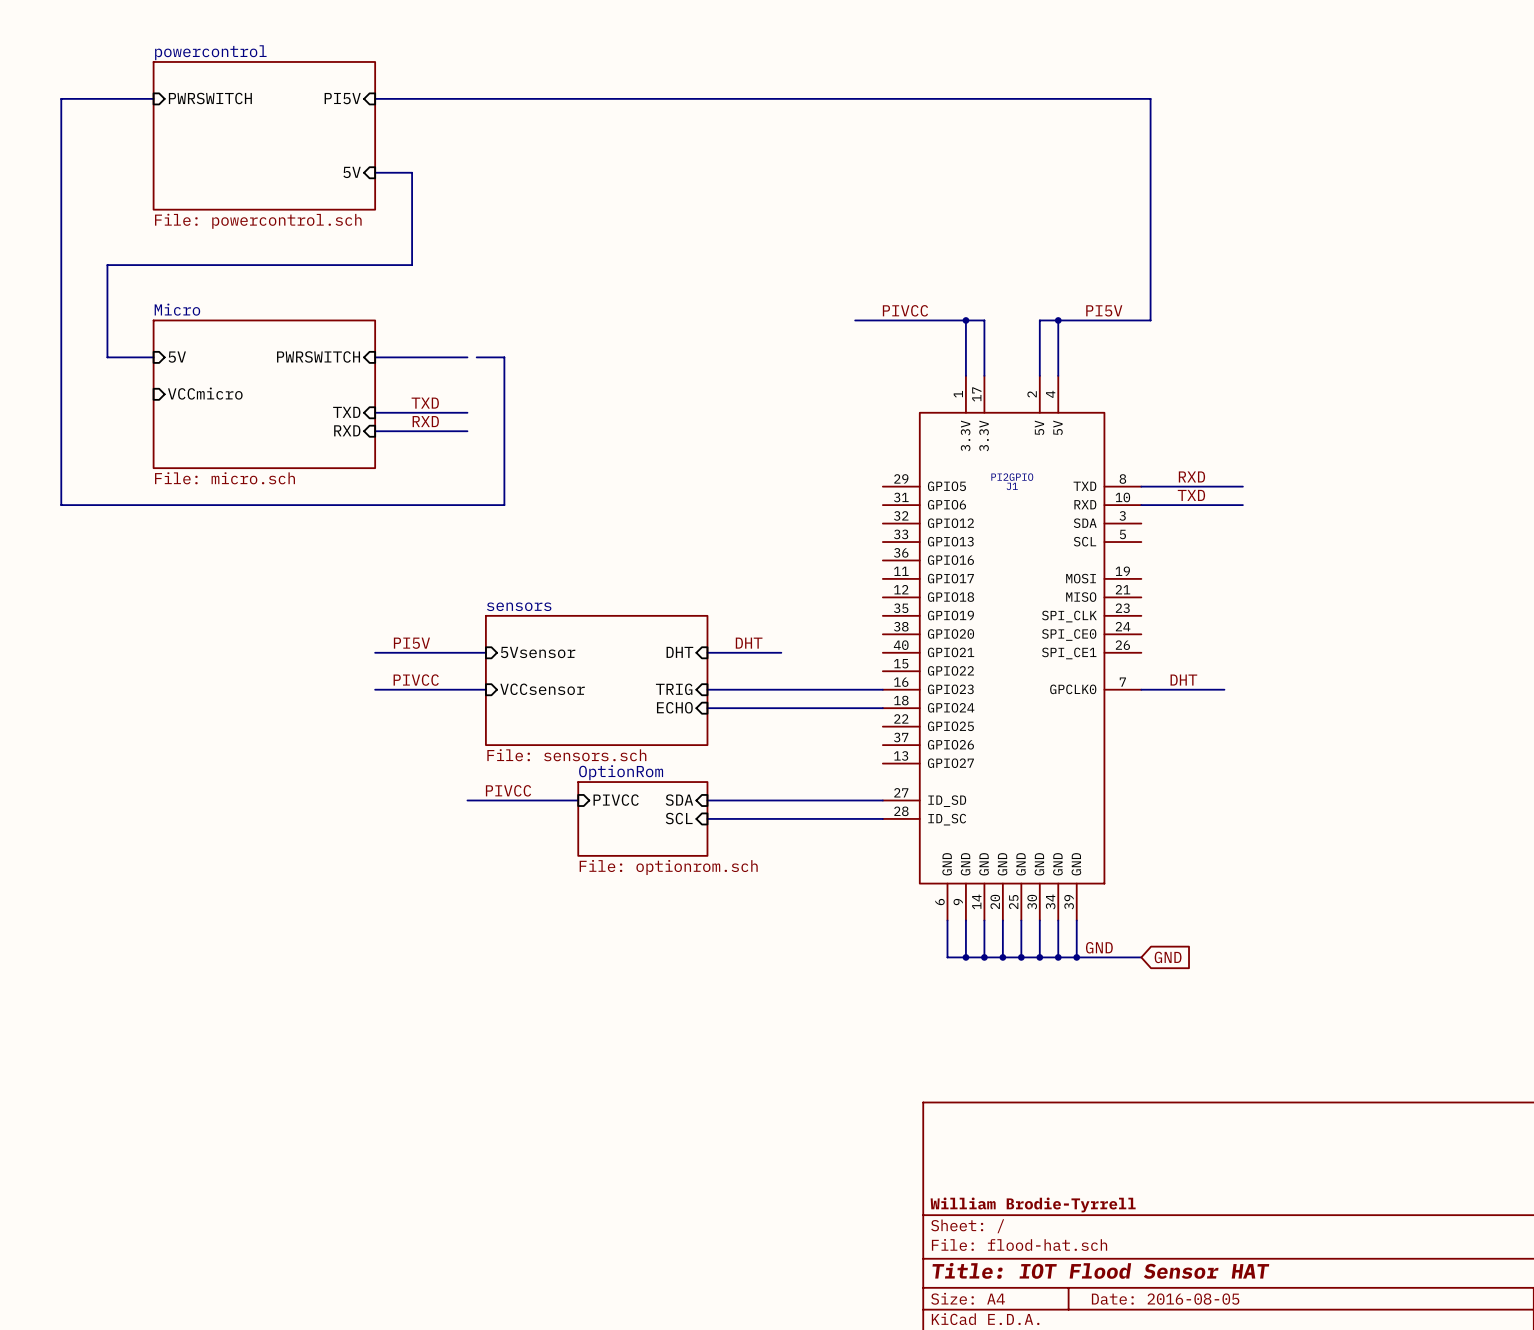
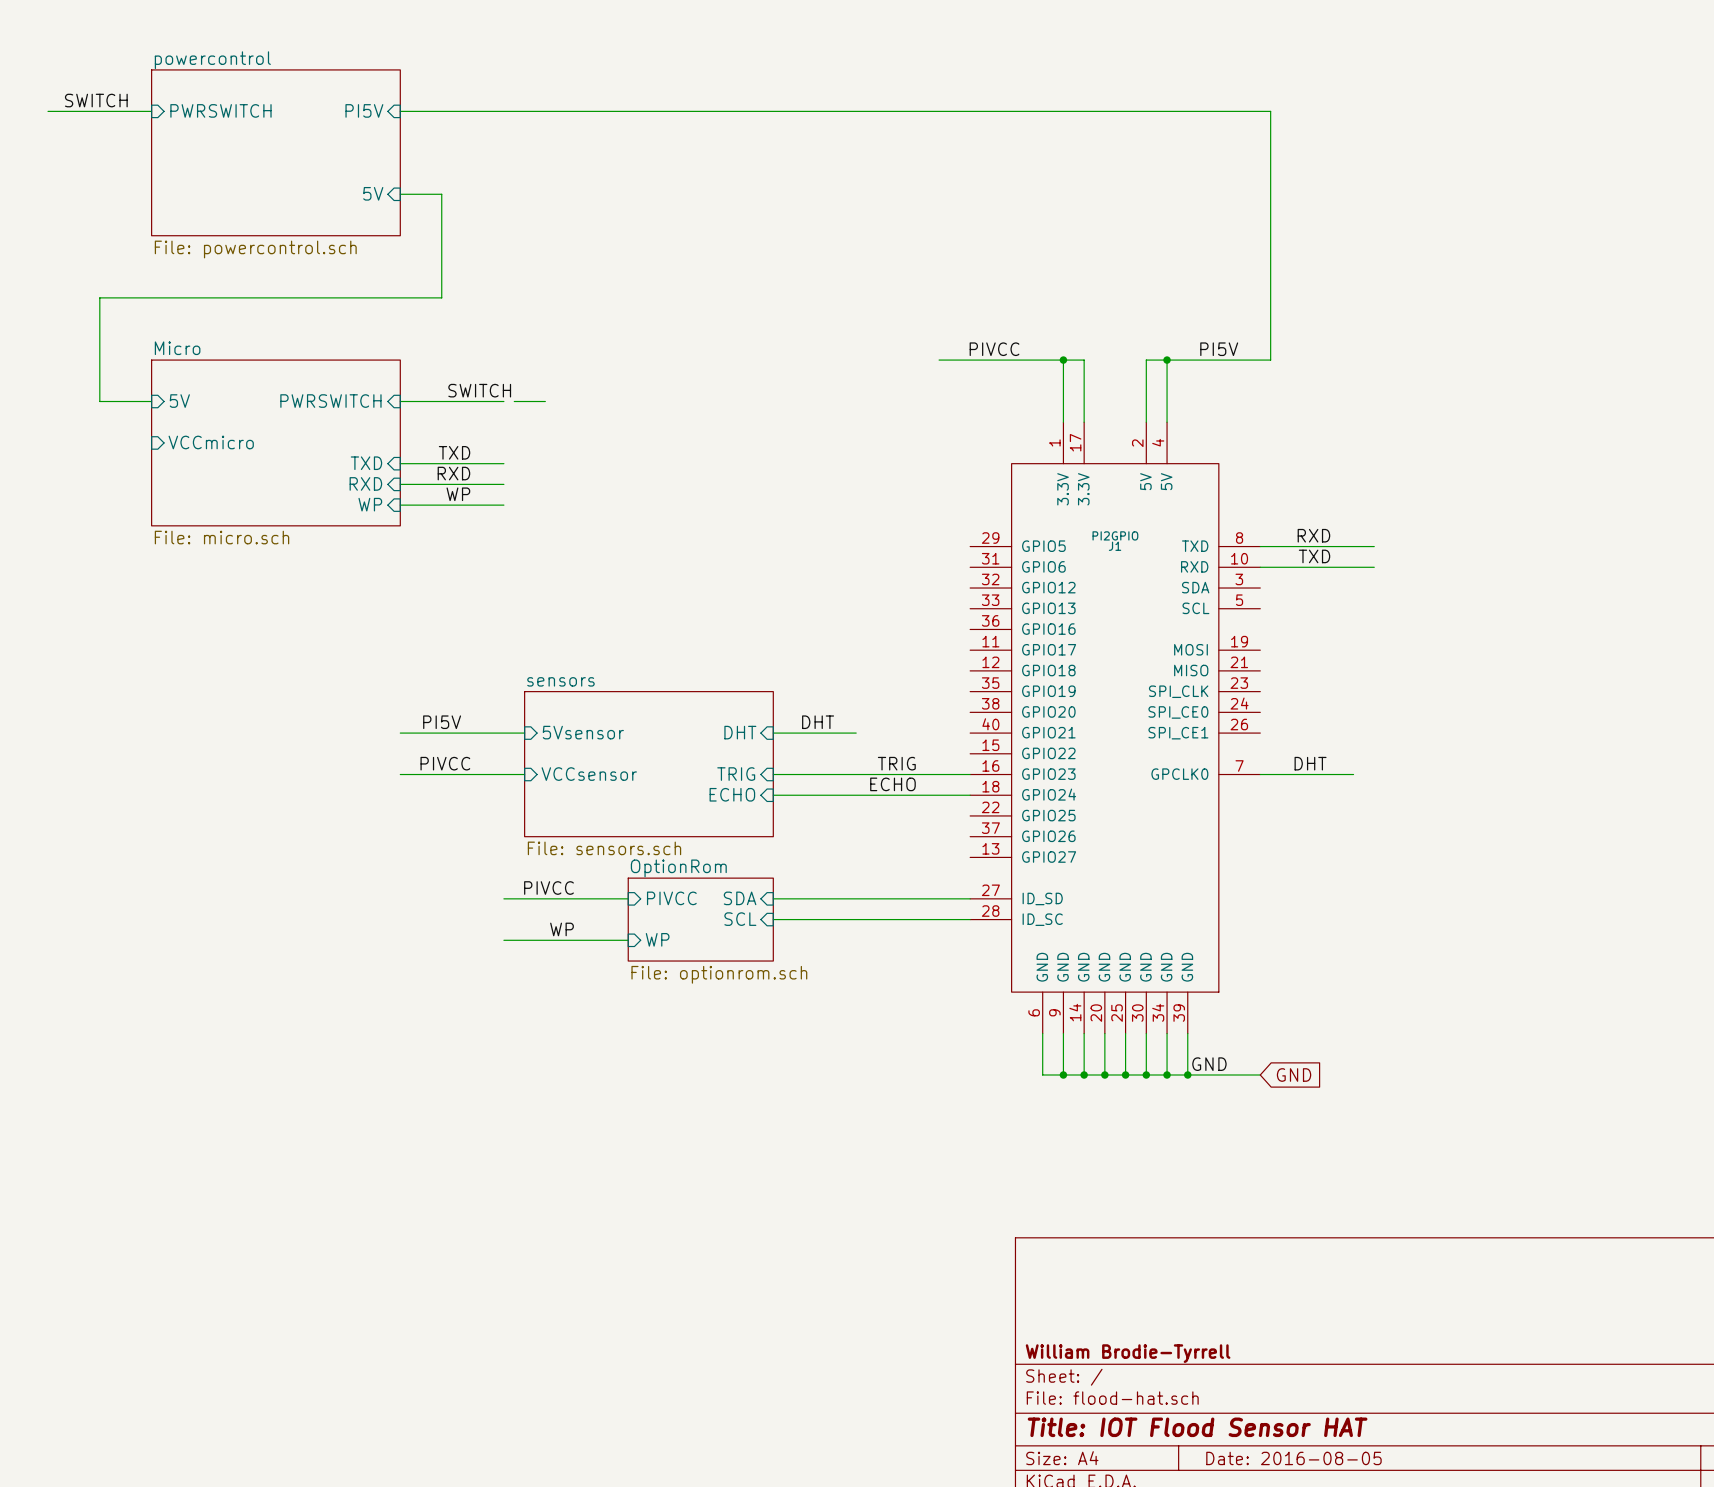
label: none -> SWITCH (96, 100)
wire: (61, 98) (61, 505) (504, 505) (504, 357) -> none
label: none -> SWITCH (479, 390)
label: none -> WP (458, 494)
sheet pin: none -> WP (370, 504)
wire: none -> (400, 505) (503, 505)
label: none -> TRIG (896, 763)
label: none -> ECHO (892, 784)
label: none -> WP (562, 929)
wire: none -> (503, 940) (628, 940)
sheet pin: none -> WP (657, 939)

